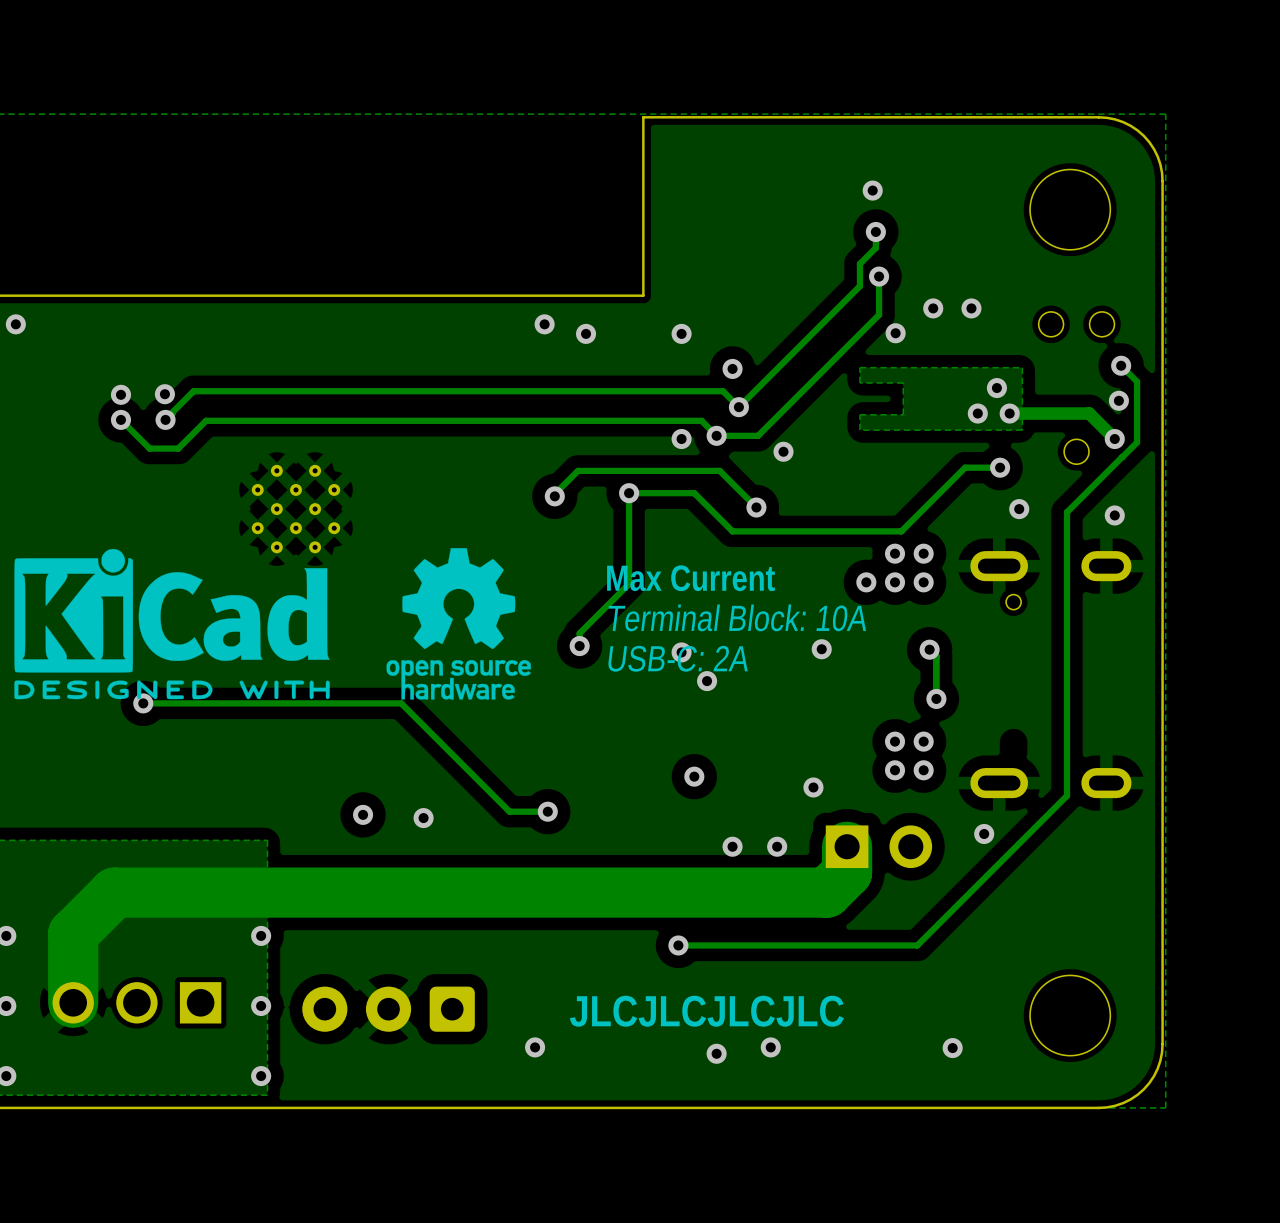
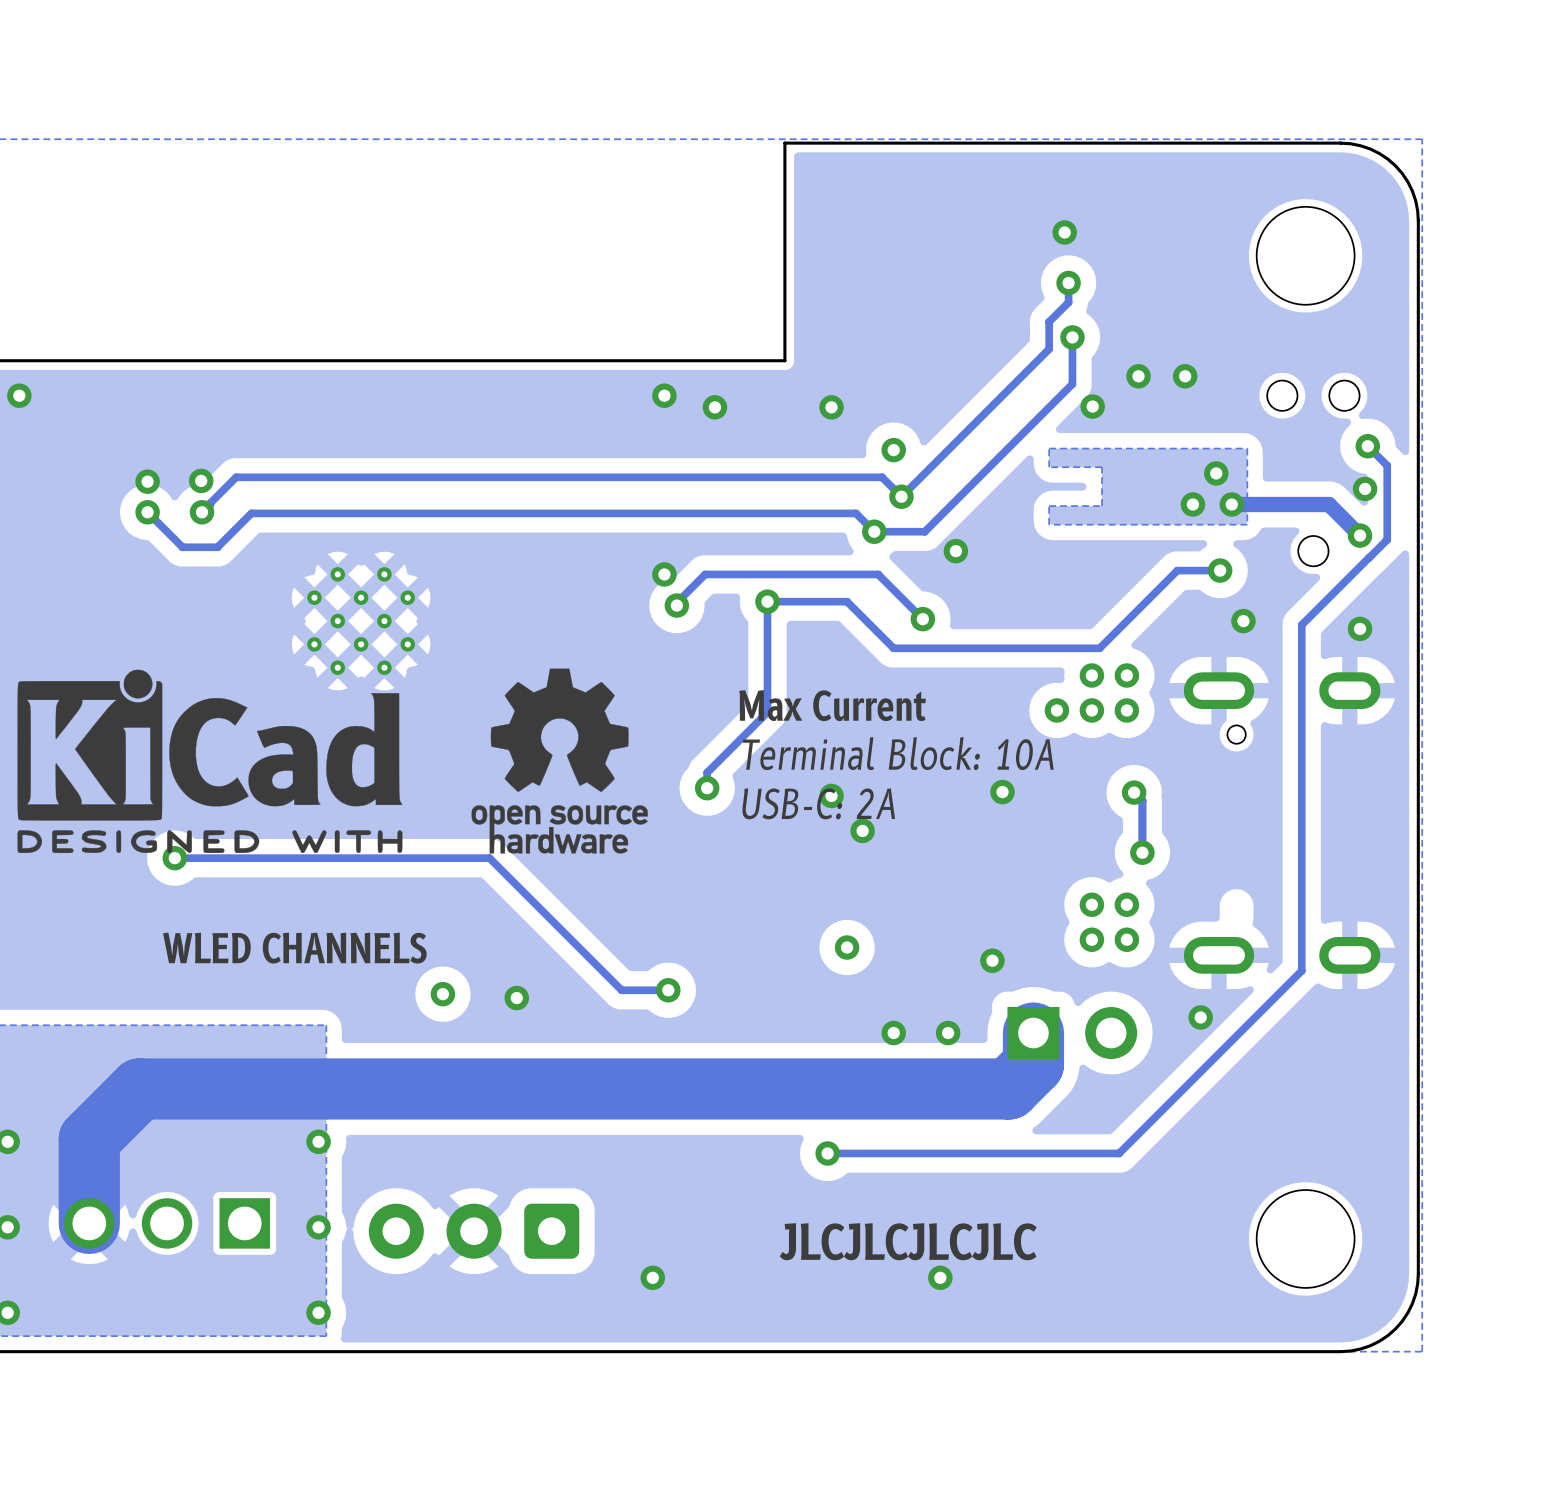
via position: (681, 439) -> (664, 574)
text: none -> WLED CHANNELS (294, 948)
text position: JLCJLCJLCJLC (706, 1011) -> JLCJLCJLCJLC (908, 1241)
via: (952, 1048) -> none
via: (716, 1053) -> none

